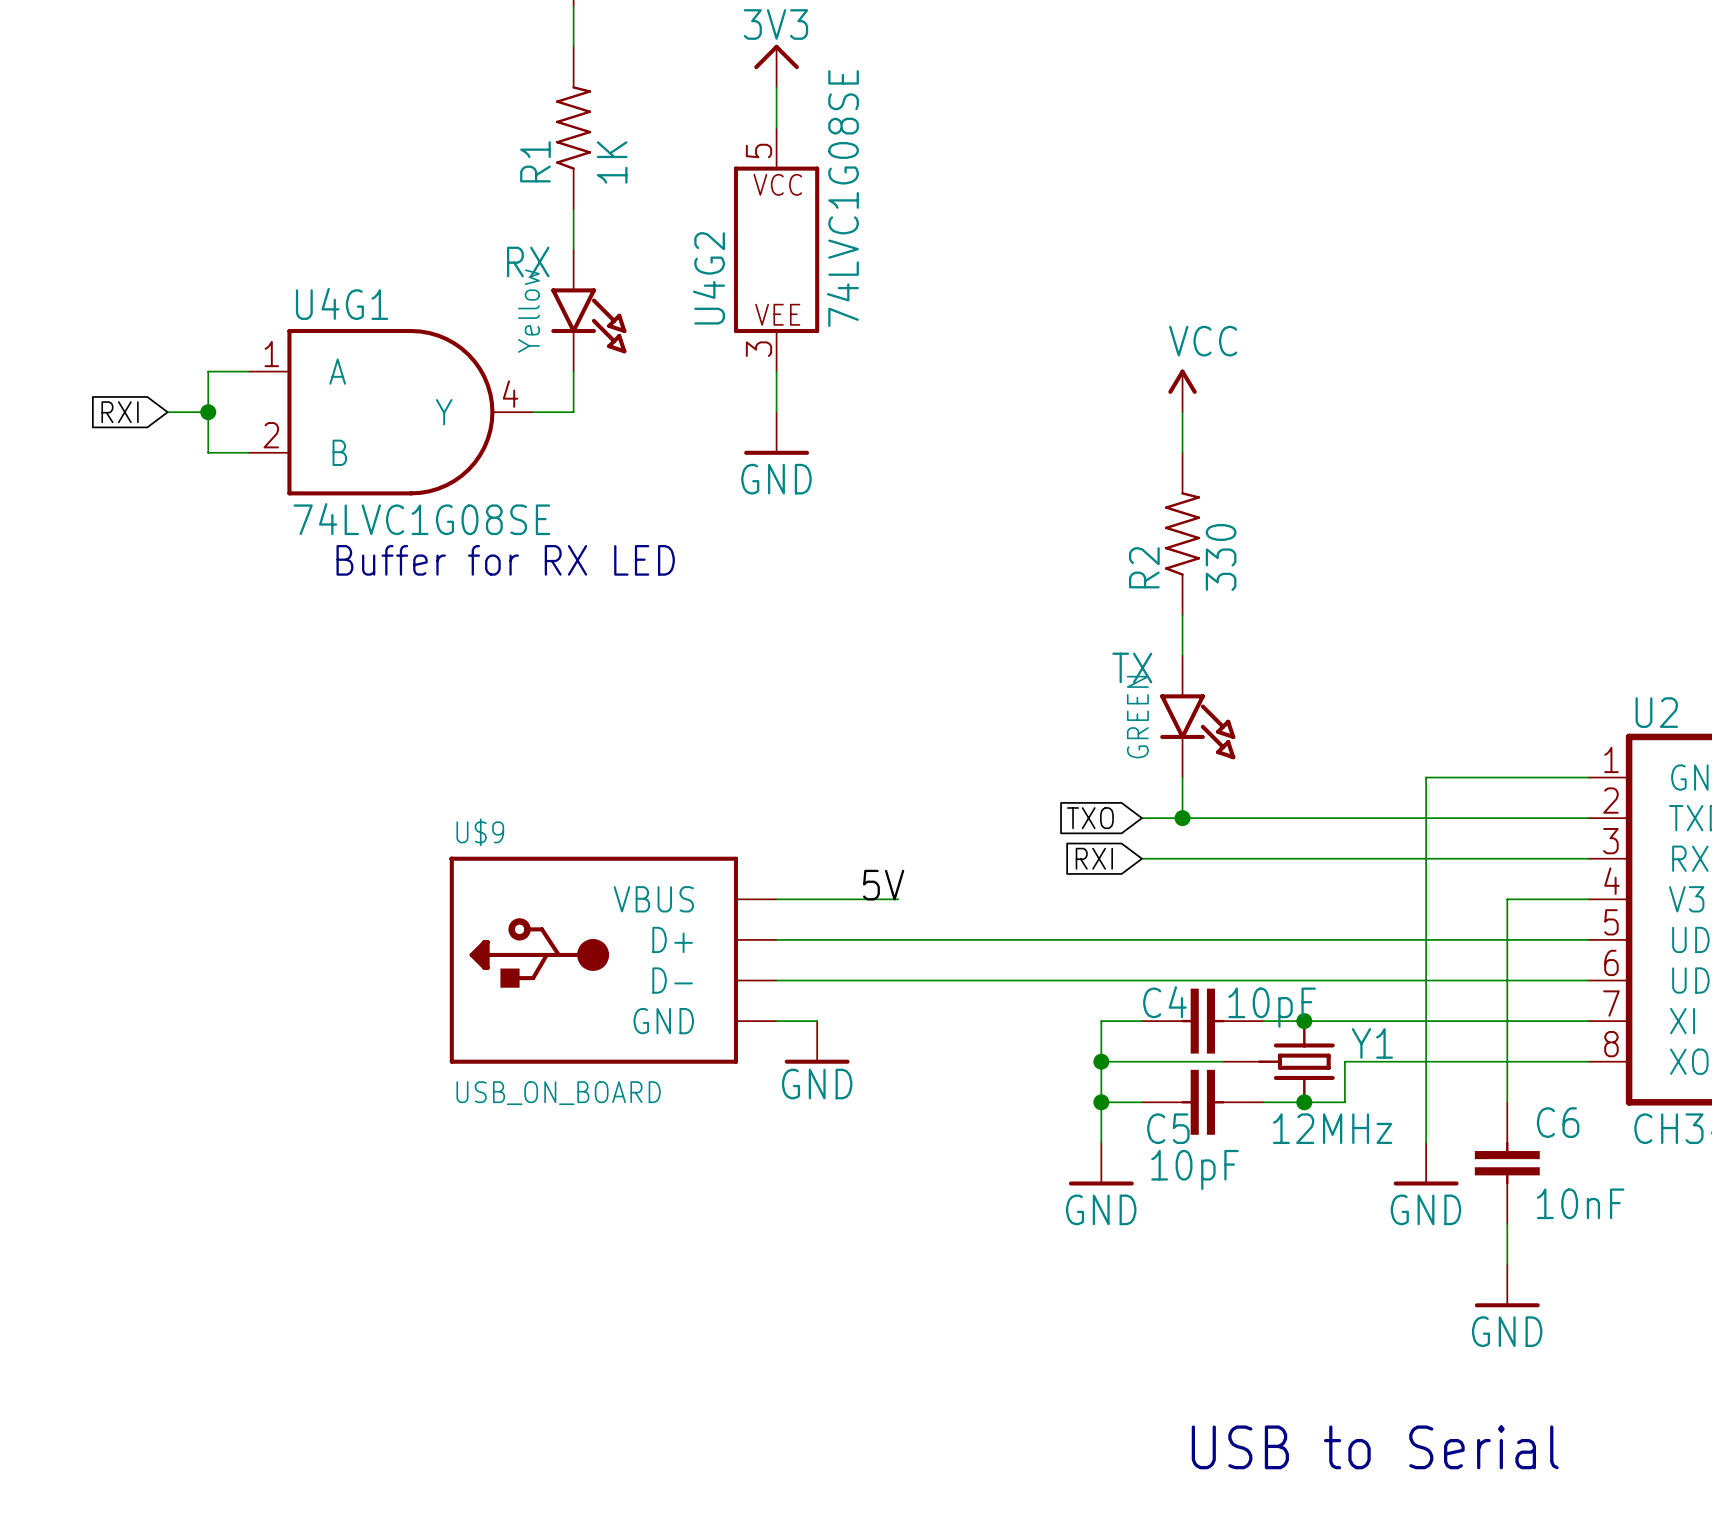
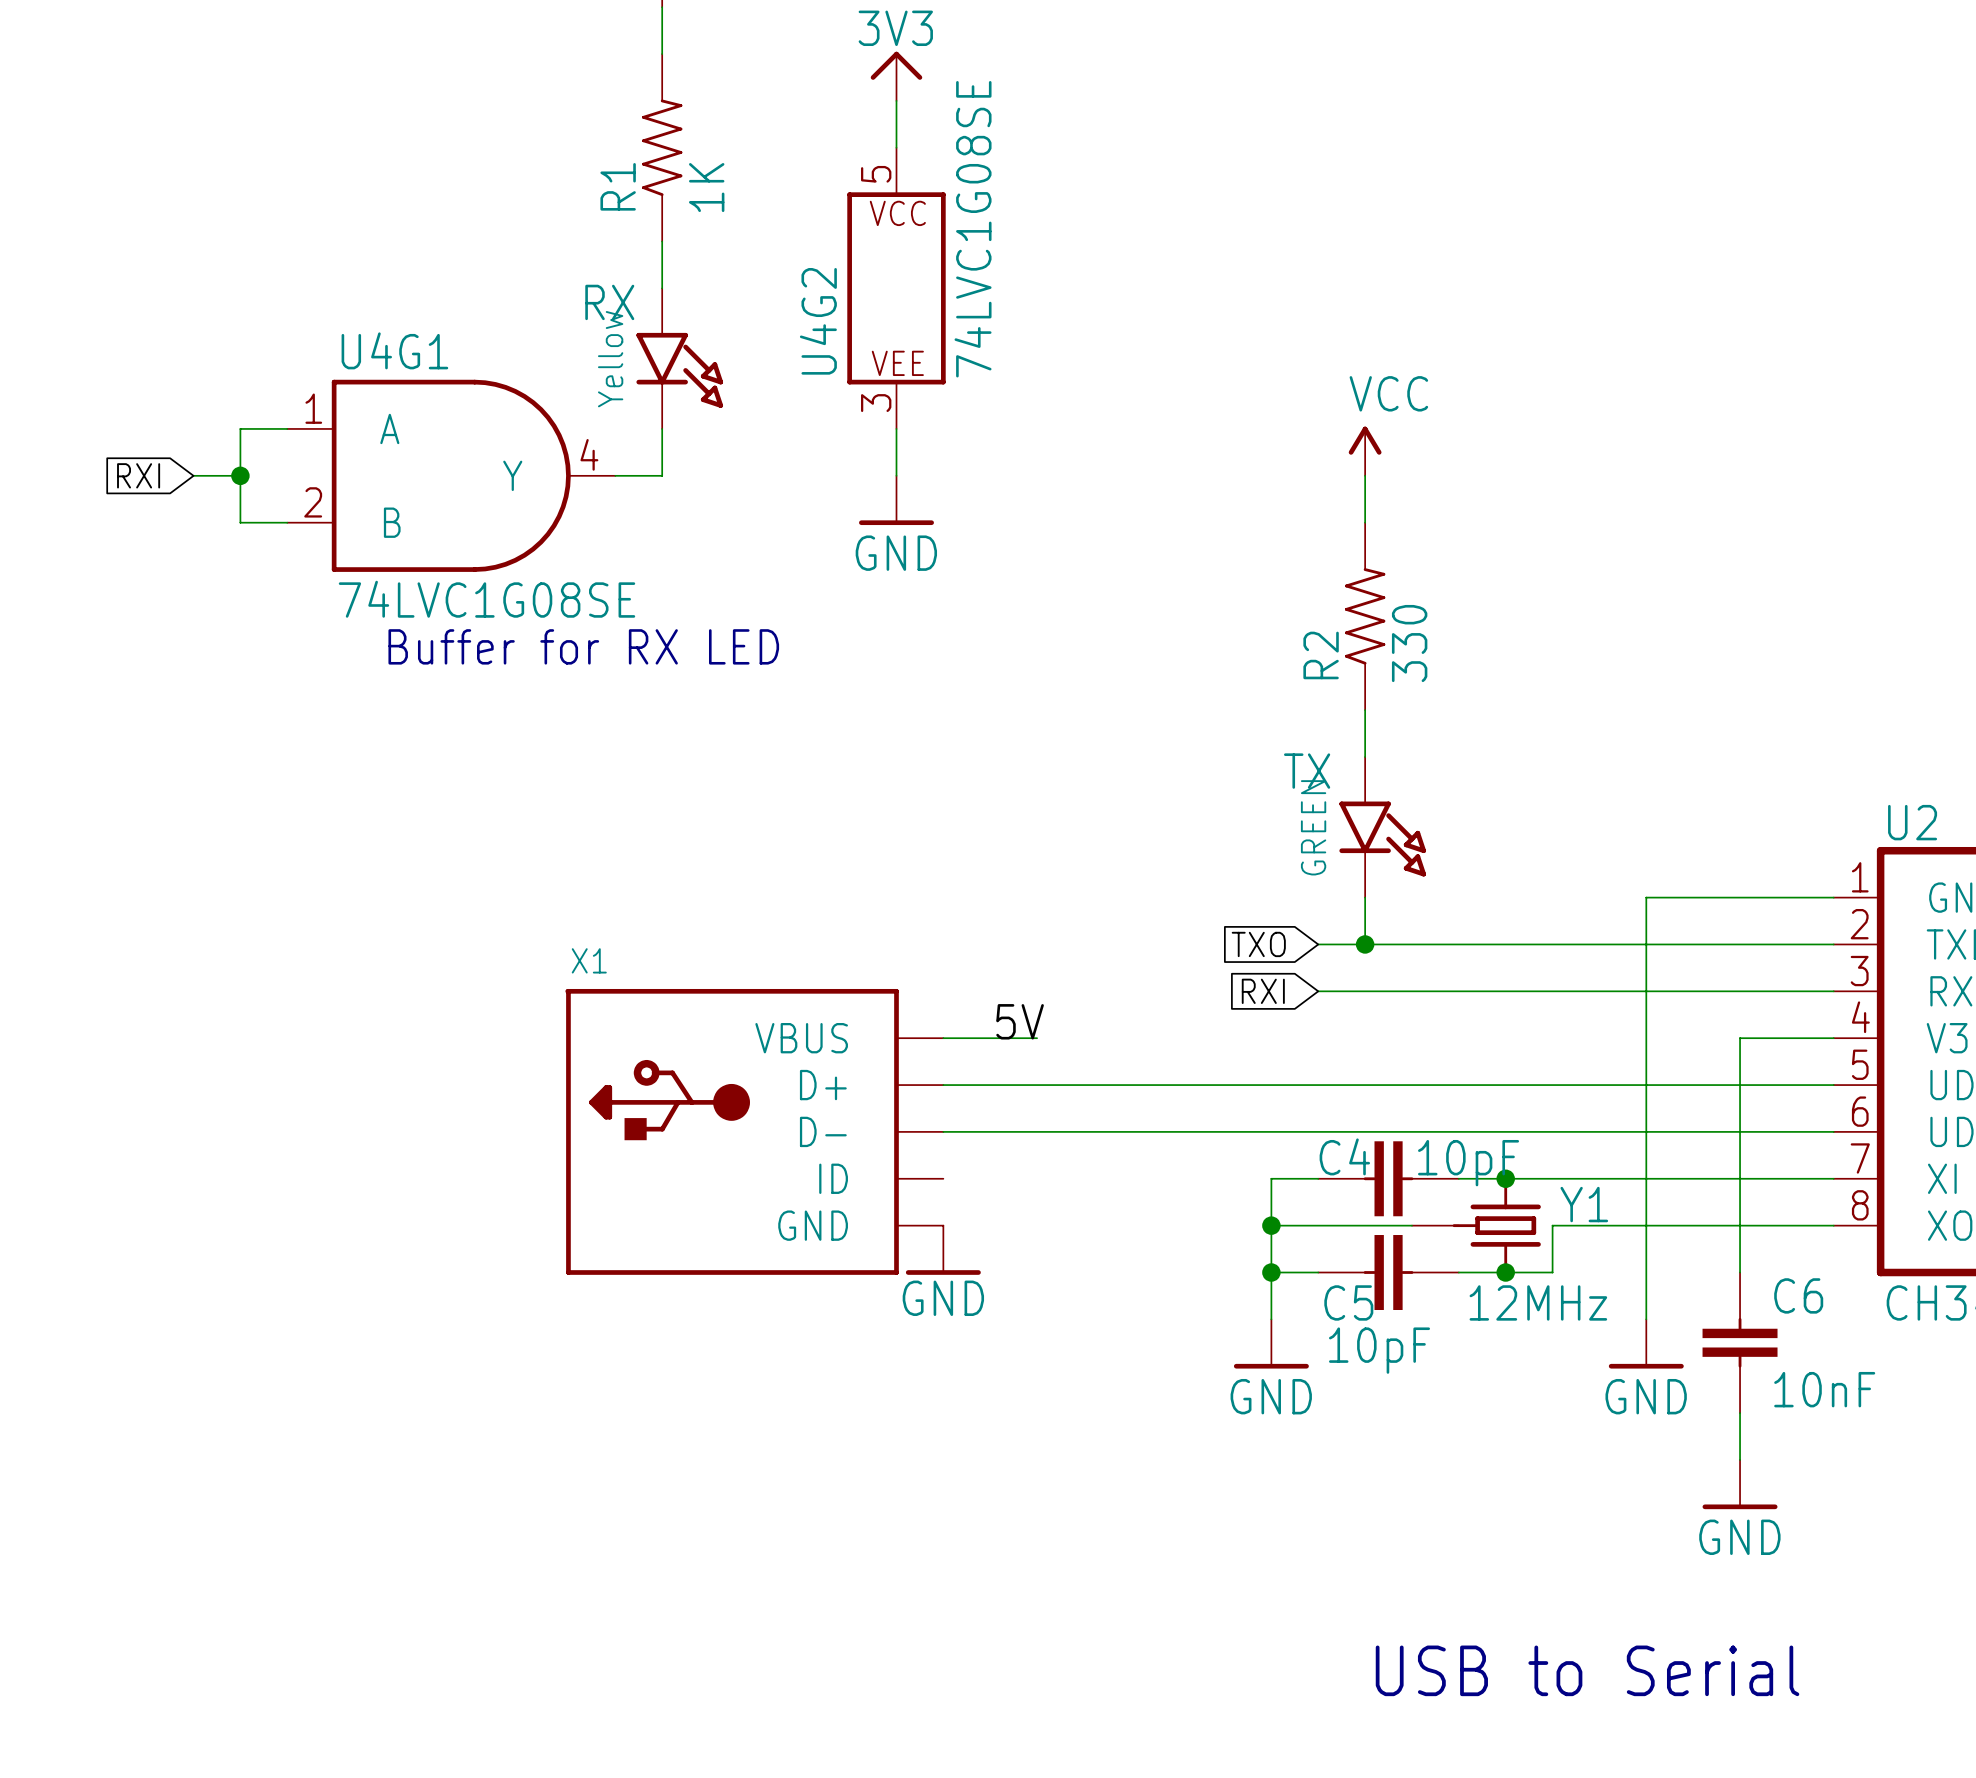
U$9: USB_ON_BOARD (612, 960) -> none
X1: none -> (754, 1131)
power symbol position: (817, 1042) -> (943, 1250)

